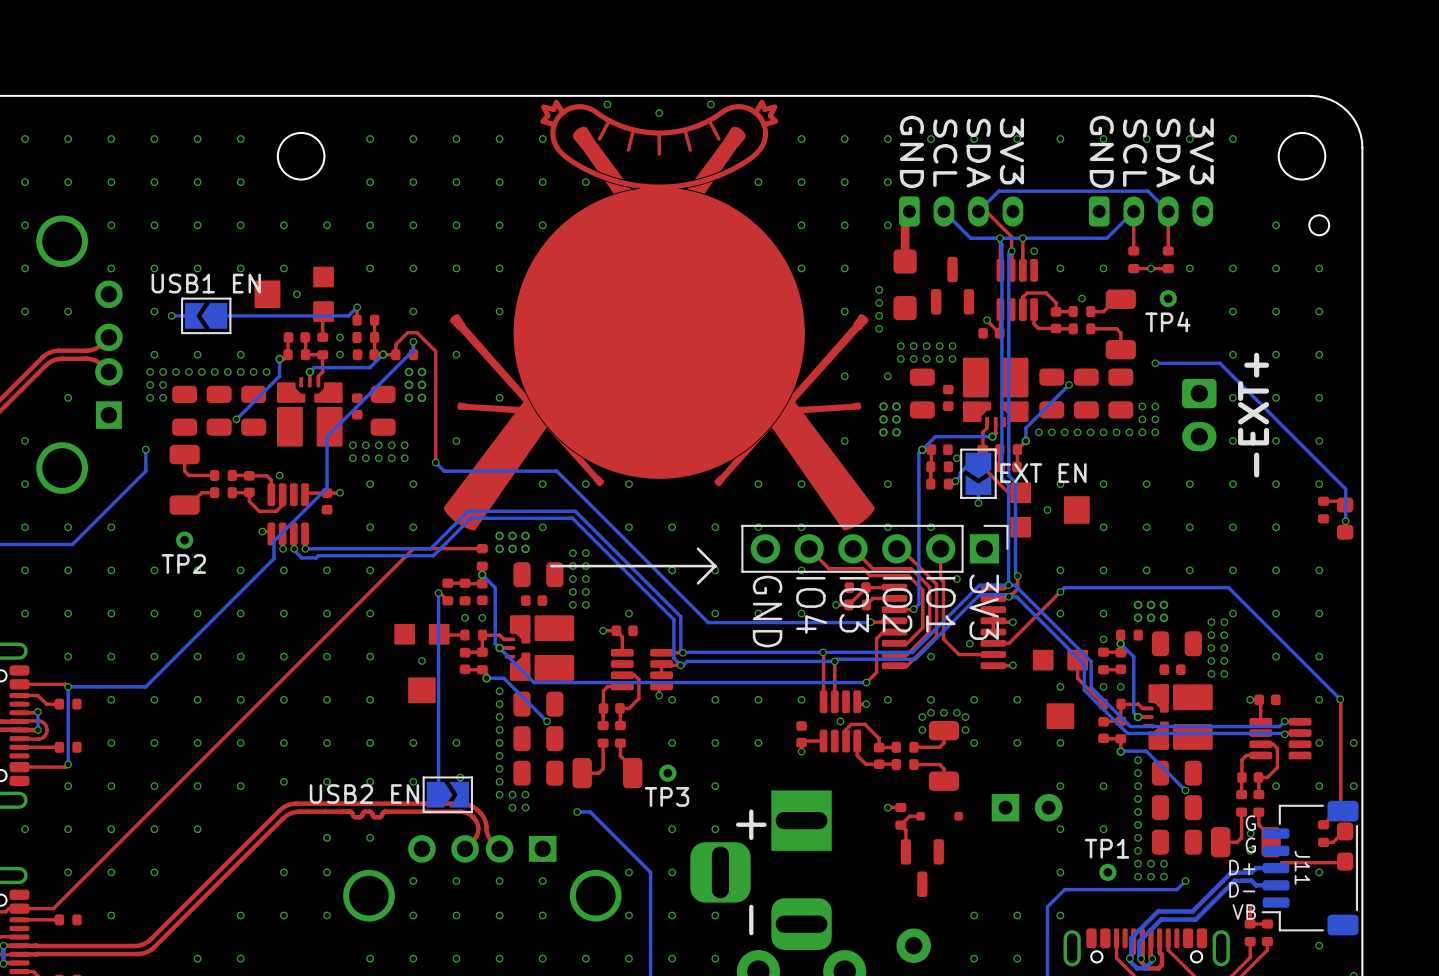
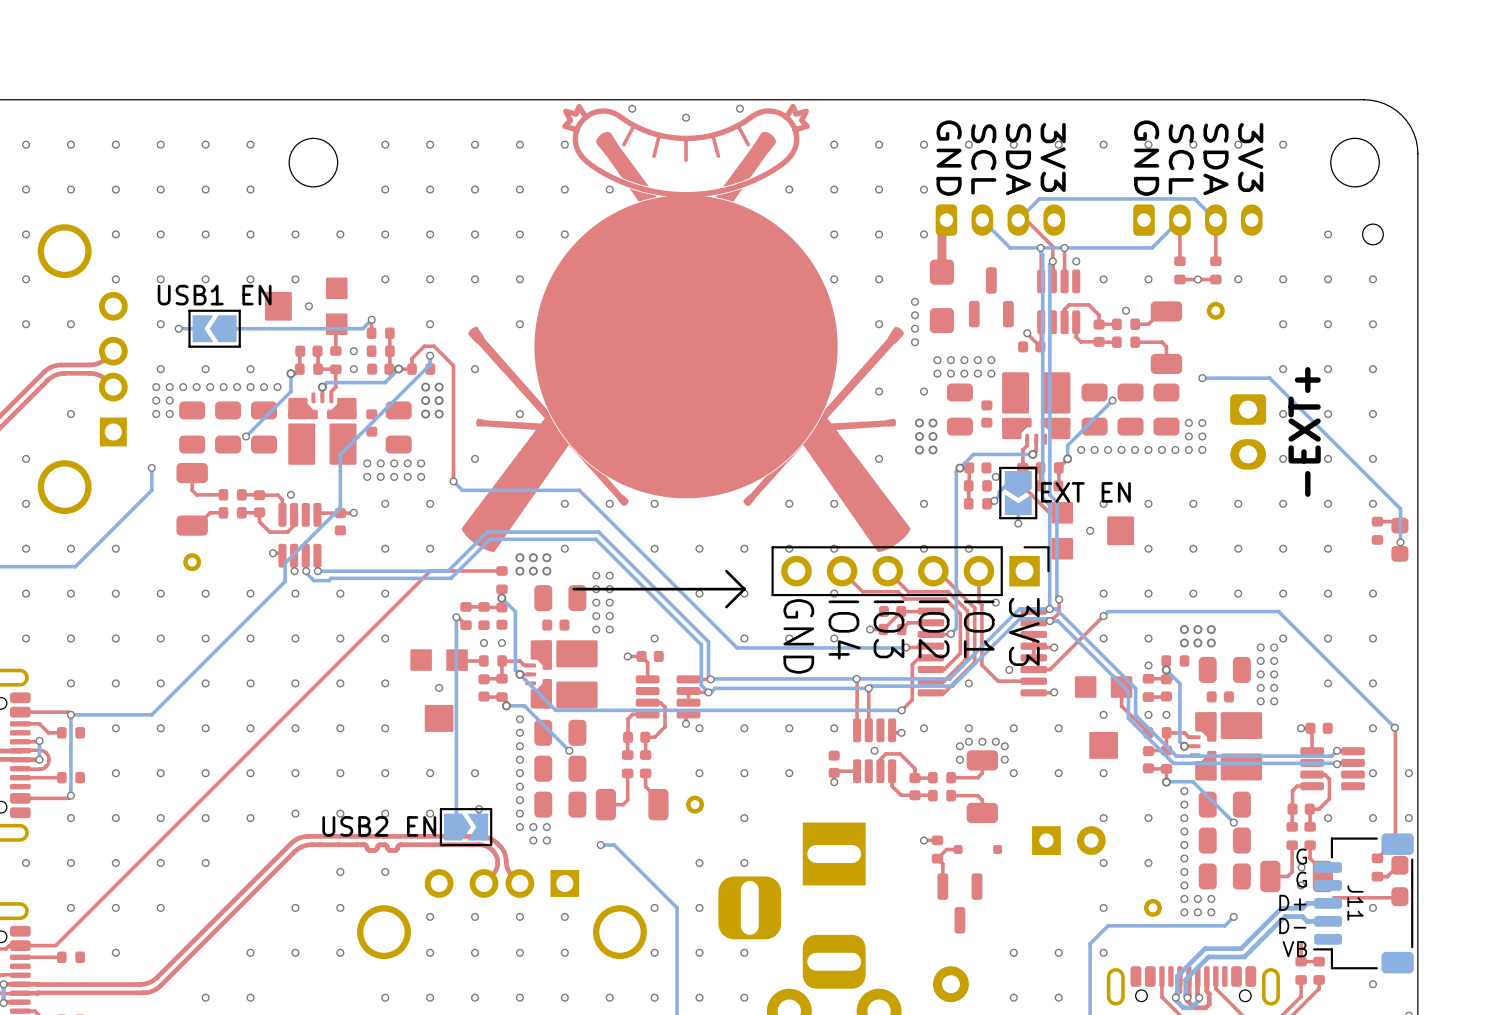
text: TP4 (1167, 321) -> none
text: TP2 (183, 563) -> none
text: TP3 (667, 796) -> none
text: TP1 (1107, 848) -> none
text: + - (751, 872) -> none

